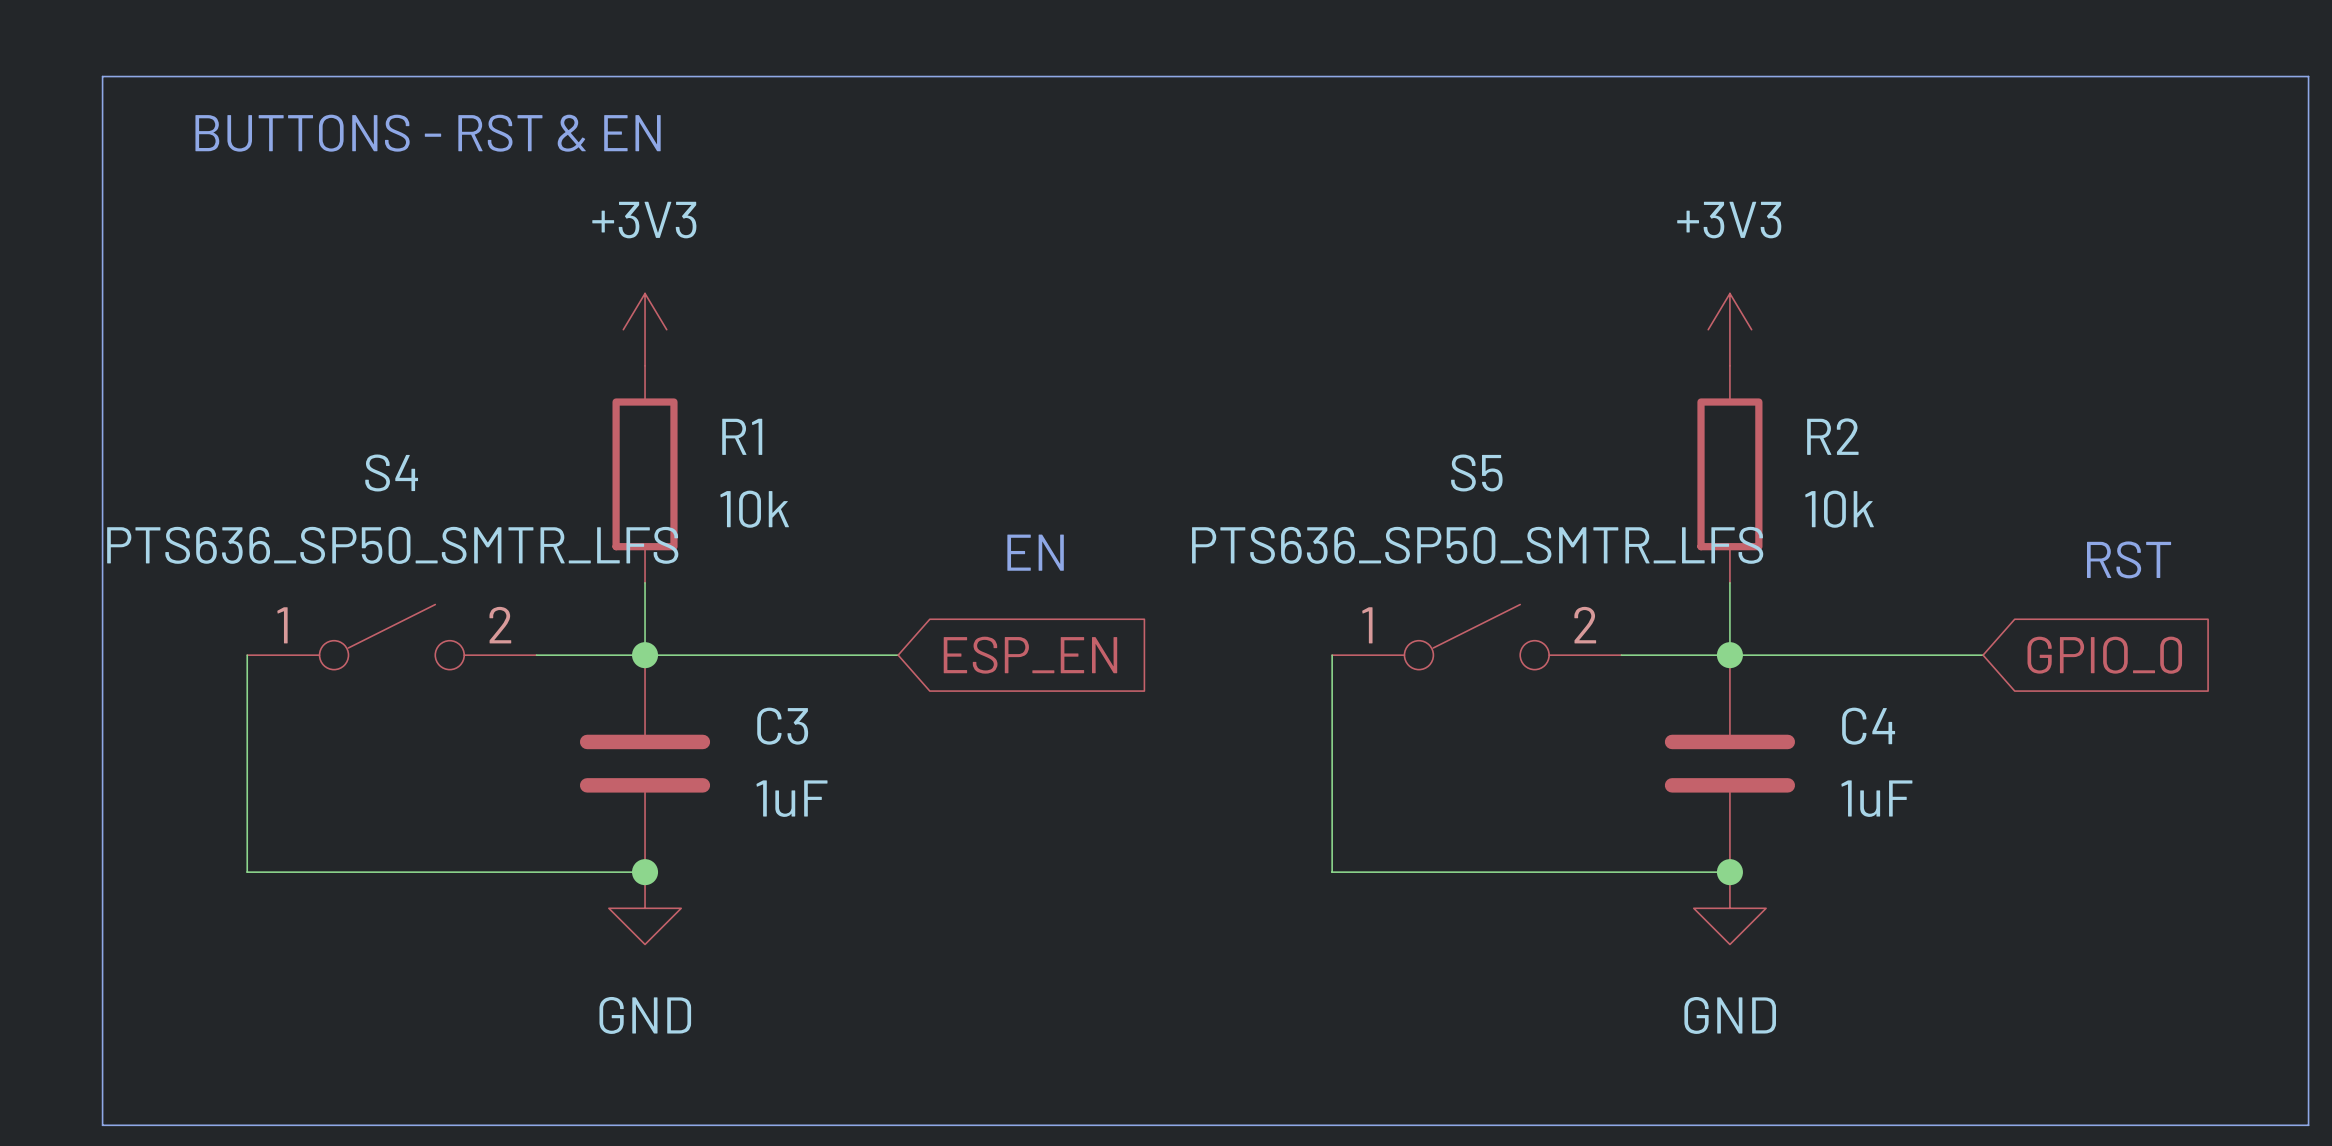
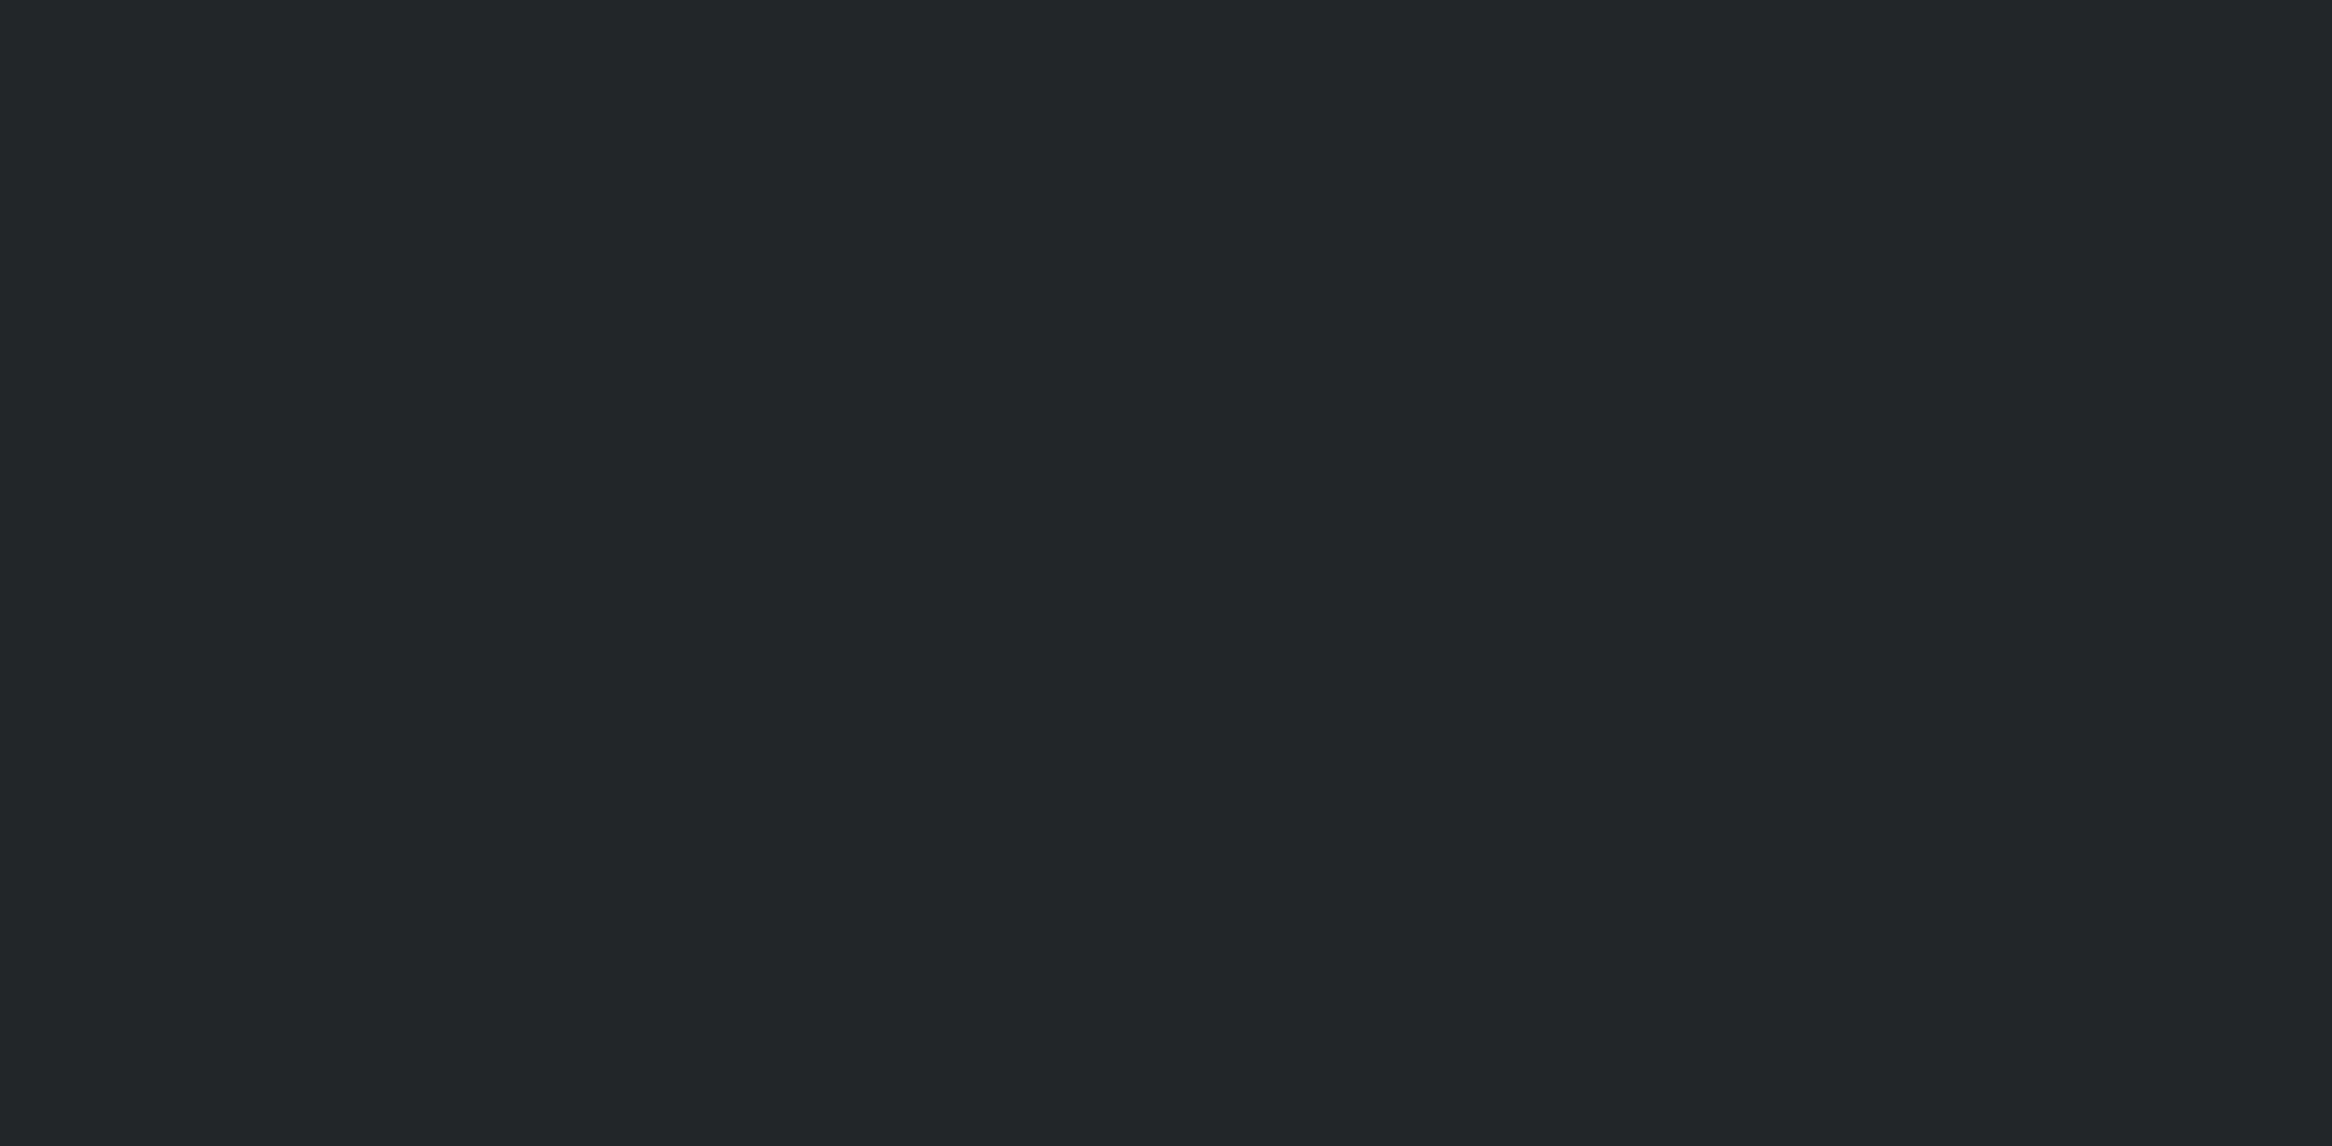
line: (102, 76) (2308, 76) (2308, 1125) (102, 1125) (102, 76) -> none
text: BUTTONS - RST & EN (428, 133) -> none
power symbol: +3V3 (645, 329) -> none
power symbol: +3V3 (1729, 329) -> none
R1: 10k (645, 474) -> none
R2: 10k (1729, 474) -> none
text: EN (1035, 552) -> none
text: RST (2129, 559) -> none
wire: (645, 582) (645, 655) -> none
wire: (1729, 582) (1729, 655) -> none
S4: PTS636_SP50_SMTR_LFS (391, 637) -> none
S5: PTS636_SP50_SMTR_LFS (1476, 637) -> none
wire: (247, 655) (247, 872) (645, 872) -> none
wire: (536, 655) (898, 655) -> none
junction: (645, 655) -> none
global label: ESP_EN (1030, 655) -> none
wire: (1332, 655) (1332, 872) (1729, 872) -> none
wire: (1621, 655) (1983, 655) -> none
junction: (1729, 655) -> none
global label: GPIO_0 (2104, 655) -> none
C3: 1uF (645, 763) -> none
C4: 1uF (1729, 763) -> none
junction: (645, 872) -> none
junction: (1729, 872) -> none
power symbol: GND (645, 908) -> none
power symbol: GND (1729, 908) -> none

